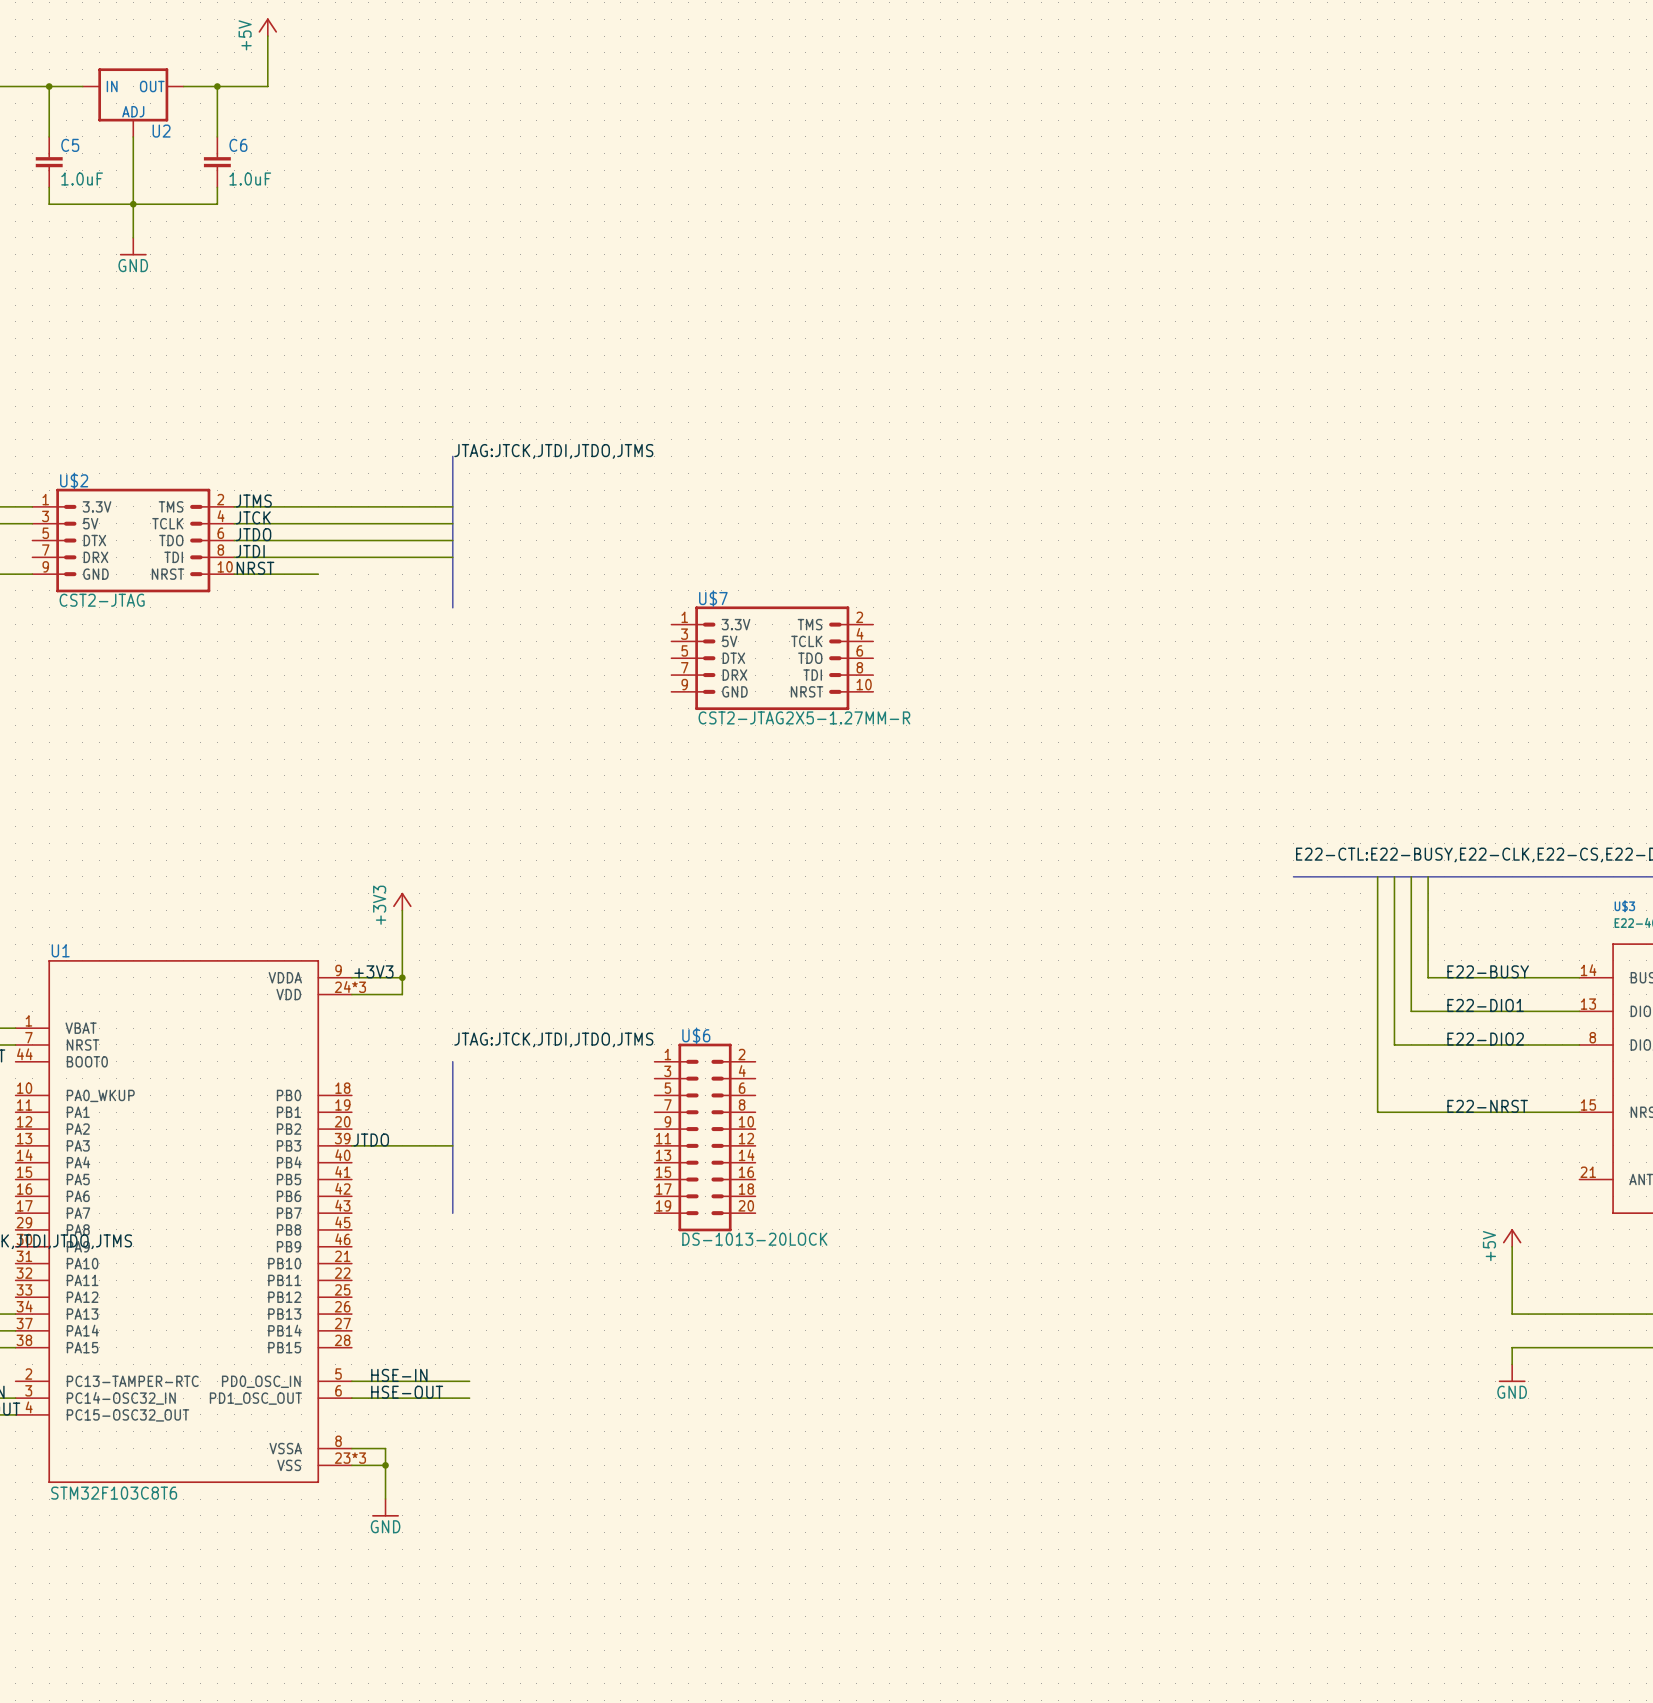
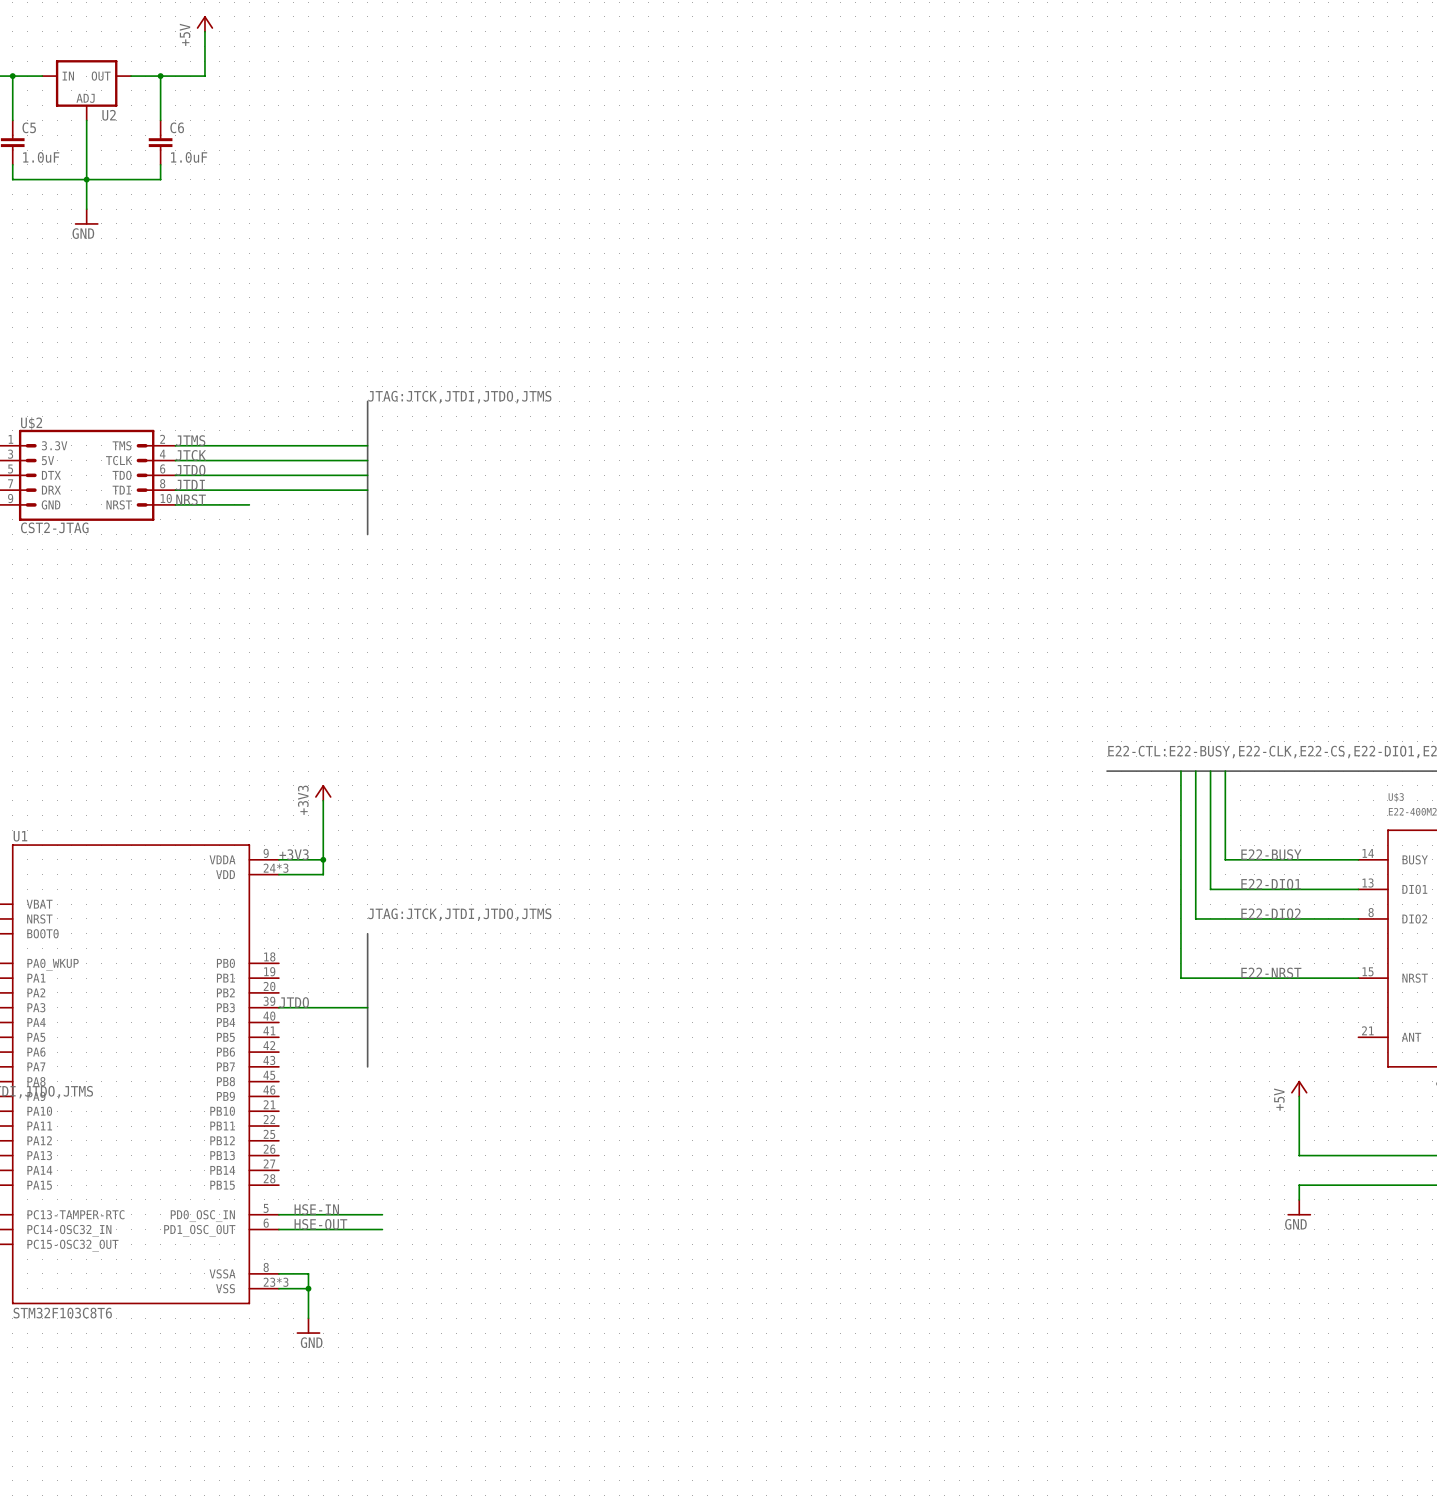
U$7: CST2-JTAG2X5-1.27MM-R (772, 658) -> none
U$6: DS-1013-20LOCK (705, 1137) -> none

